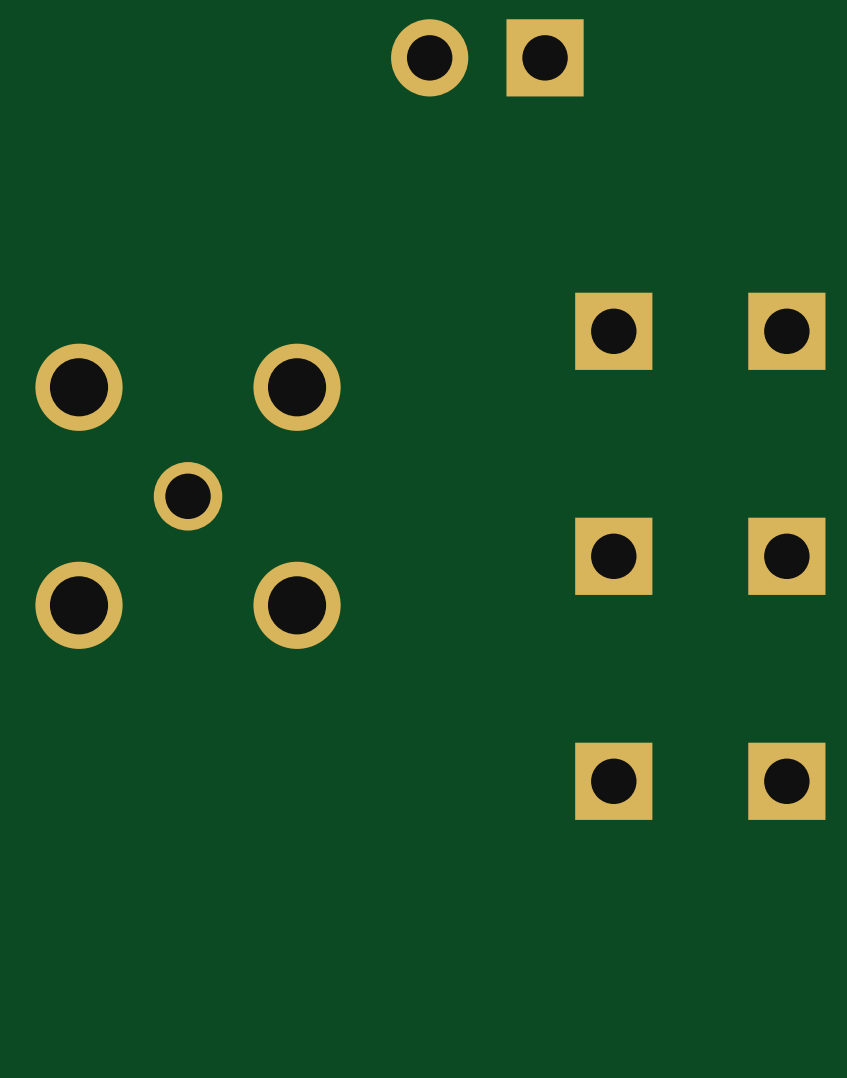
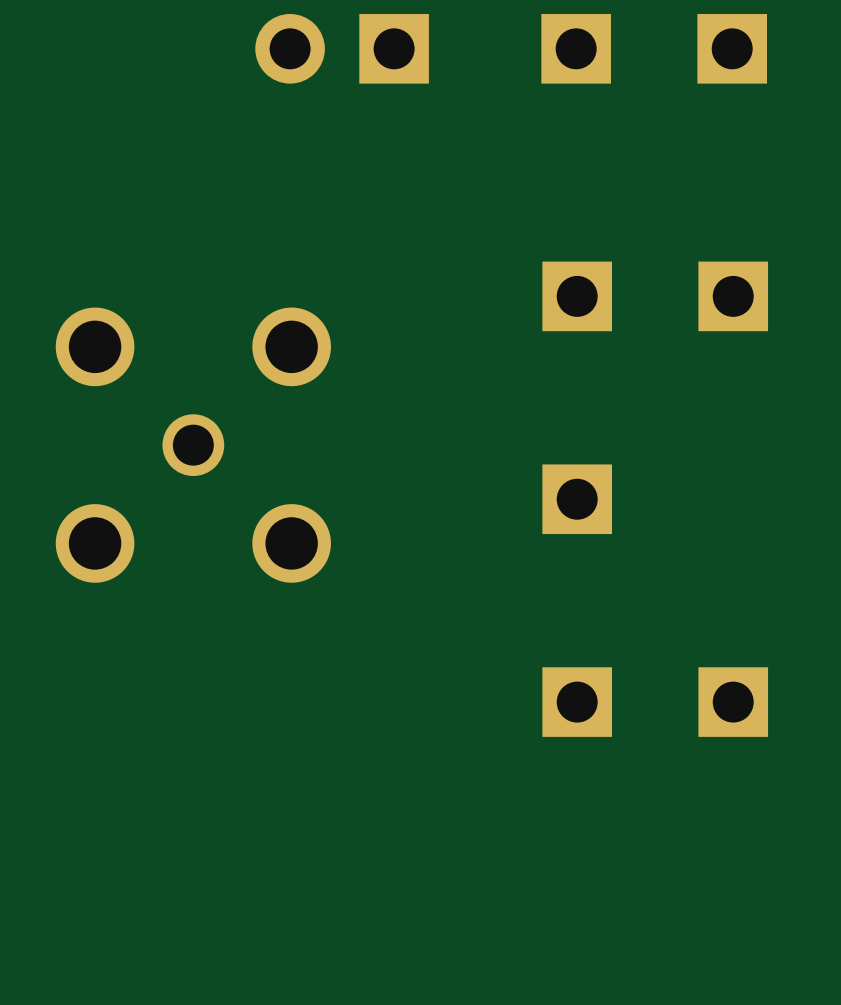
part: none -> (576, 48)
part: none -> (732, 48)
part position: (487, 57) -> (342, 48)
part: (786, 556) -> none

